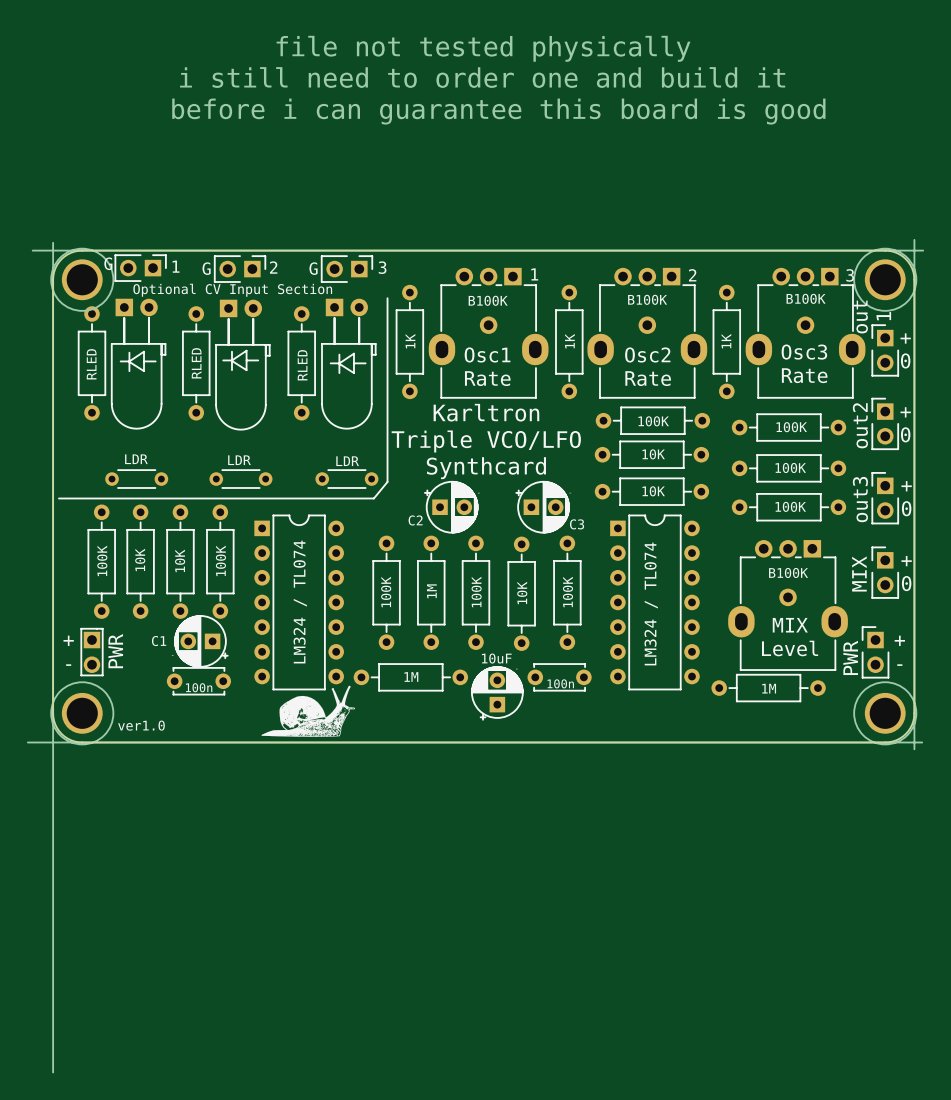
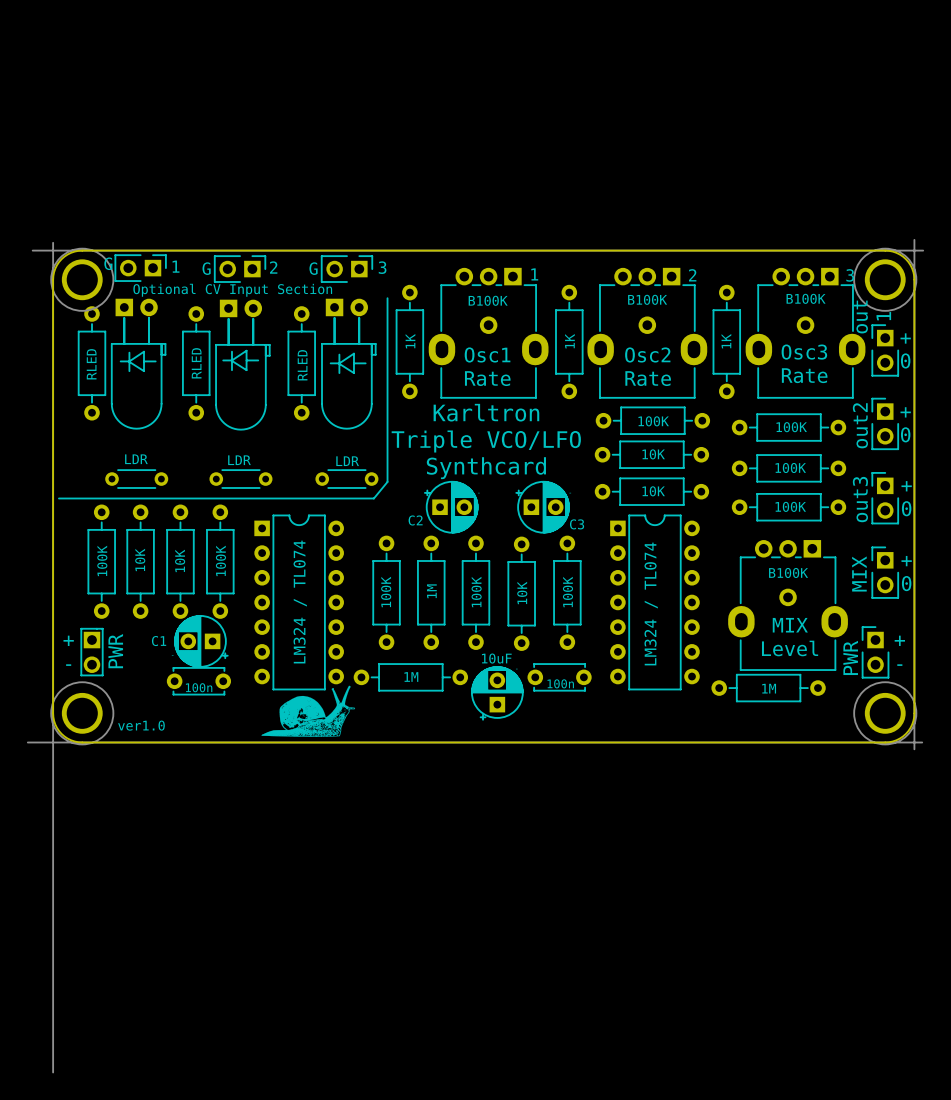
text: file not tested physically (483, 48) -> none
text: i still need to order one and build it (482, 77) -> none
text: before i can guarantee this board is good (498, 111) -> none

